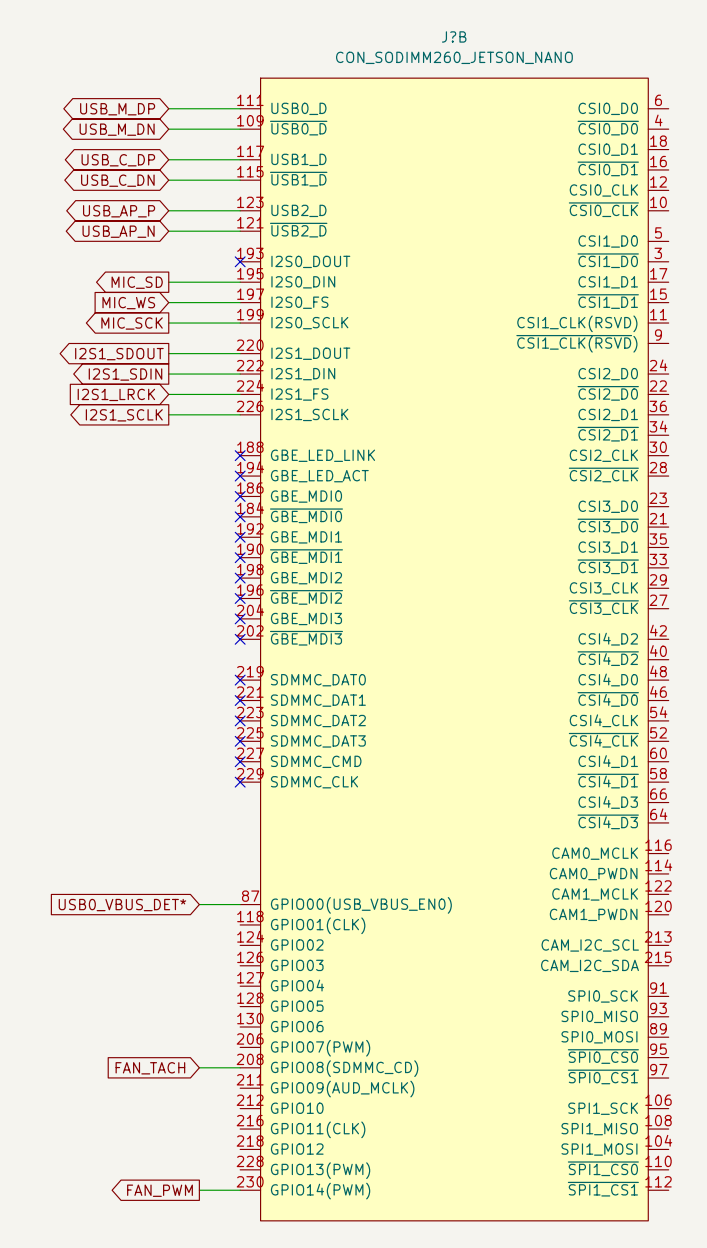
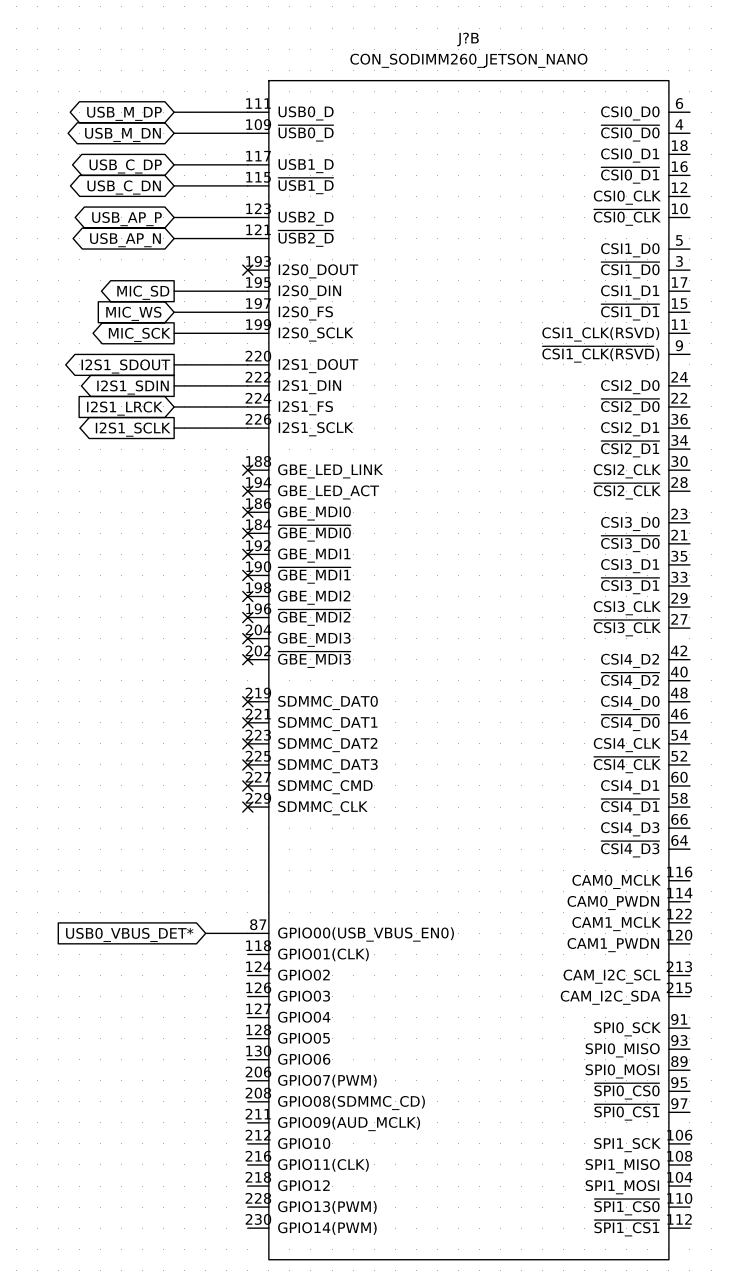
J?B symbol: [240, 78, 669, 1221] -> [247, 80, 690, 1260]
wire: (199, 1067) (240, 1067) -> none
global label: FAN_TACH (150, 1068) -> none
global label: FAN_PWM (159, 1190) -> none
wire: (199, 1190) (240, 1190) -> none

